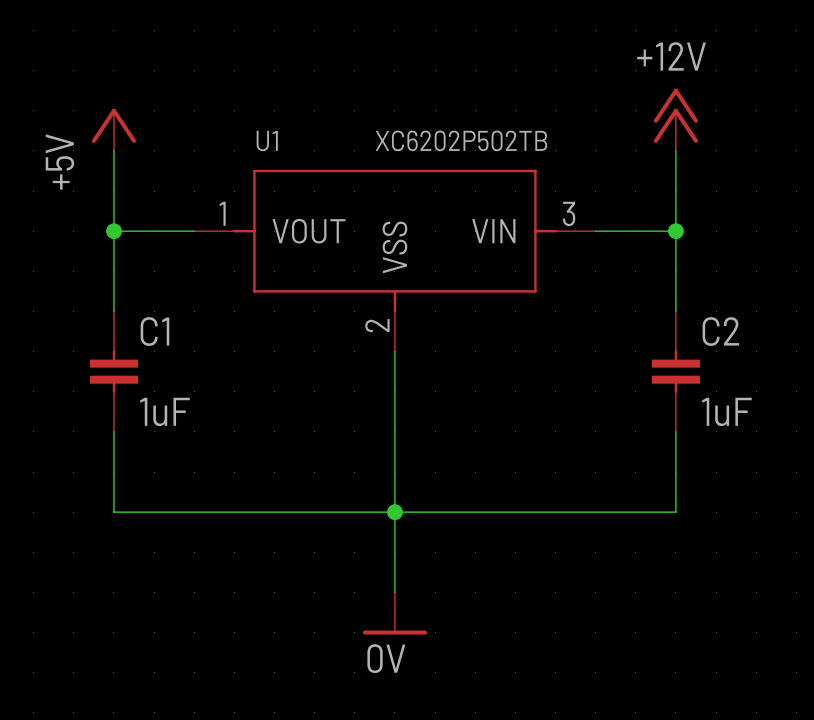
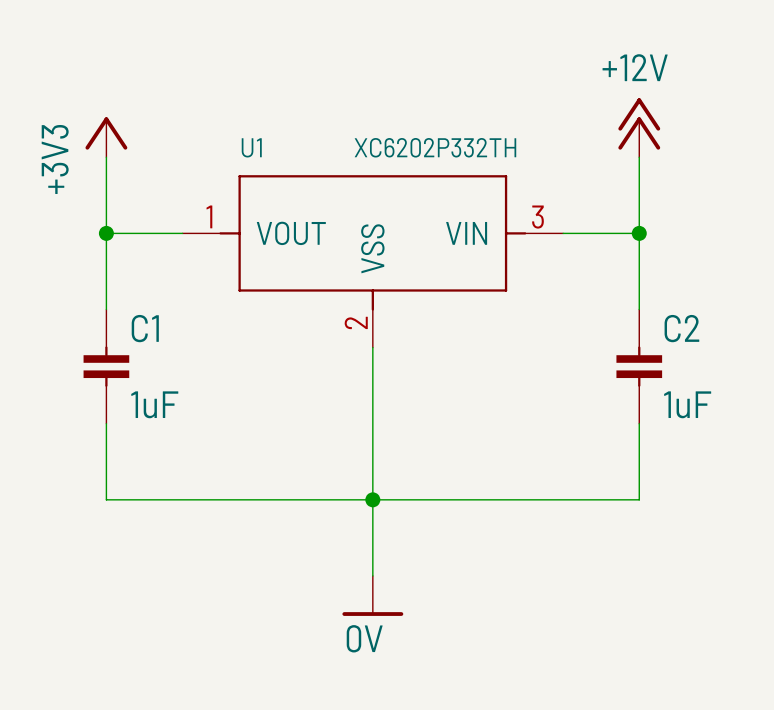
power symbol: +5V (113, 129) -> +3V3 (106, 137)
U1 value: XC6202P502TB (461, 140) -> XC6202P332TH (435, 147)

